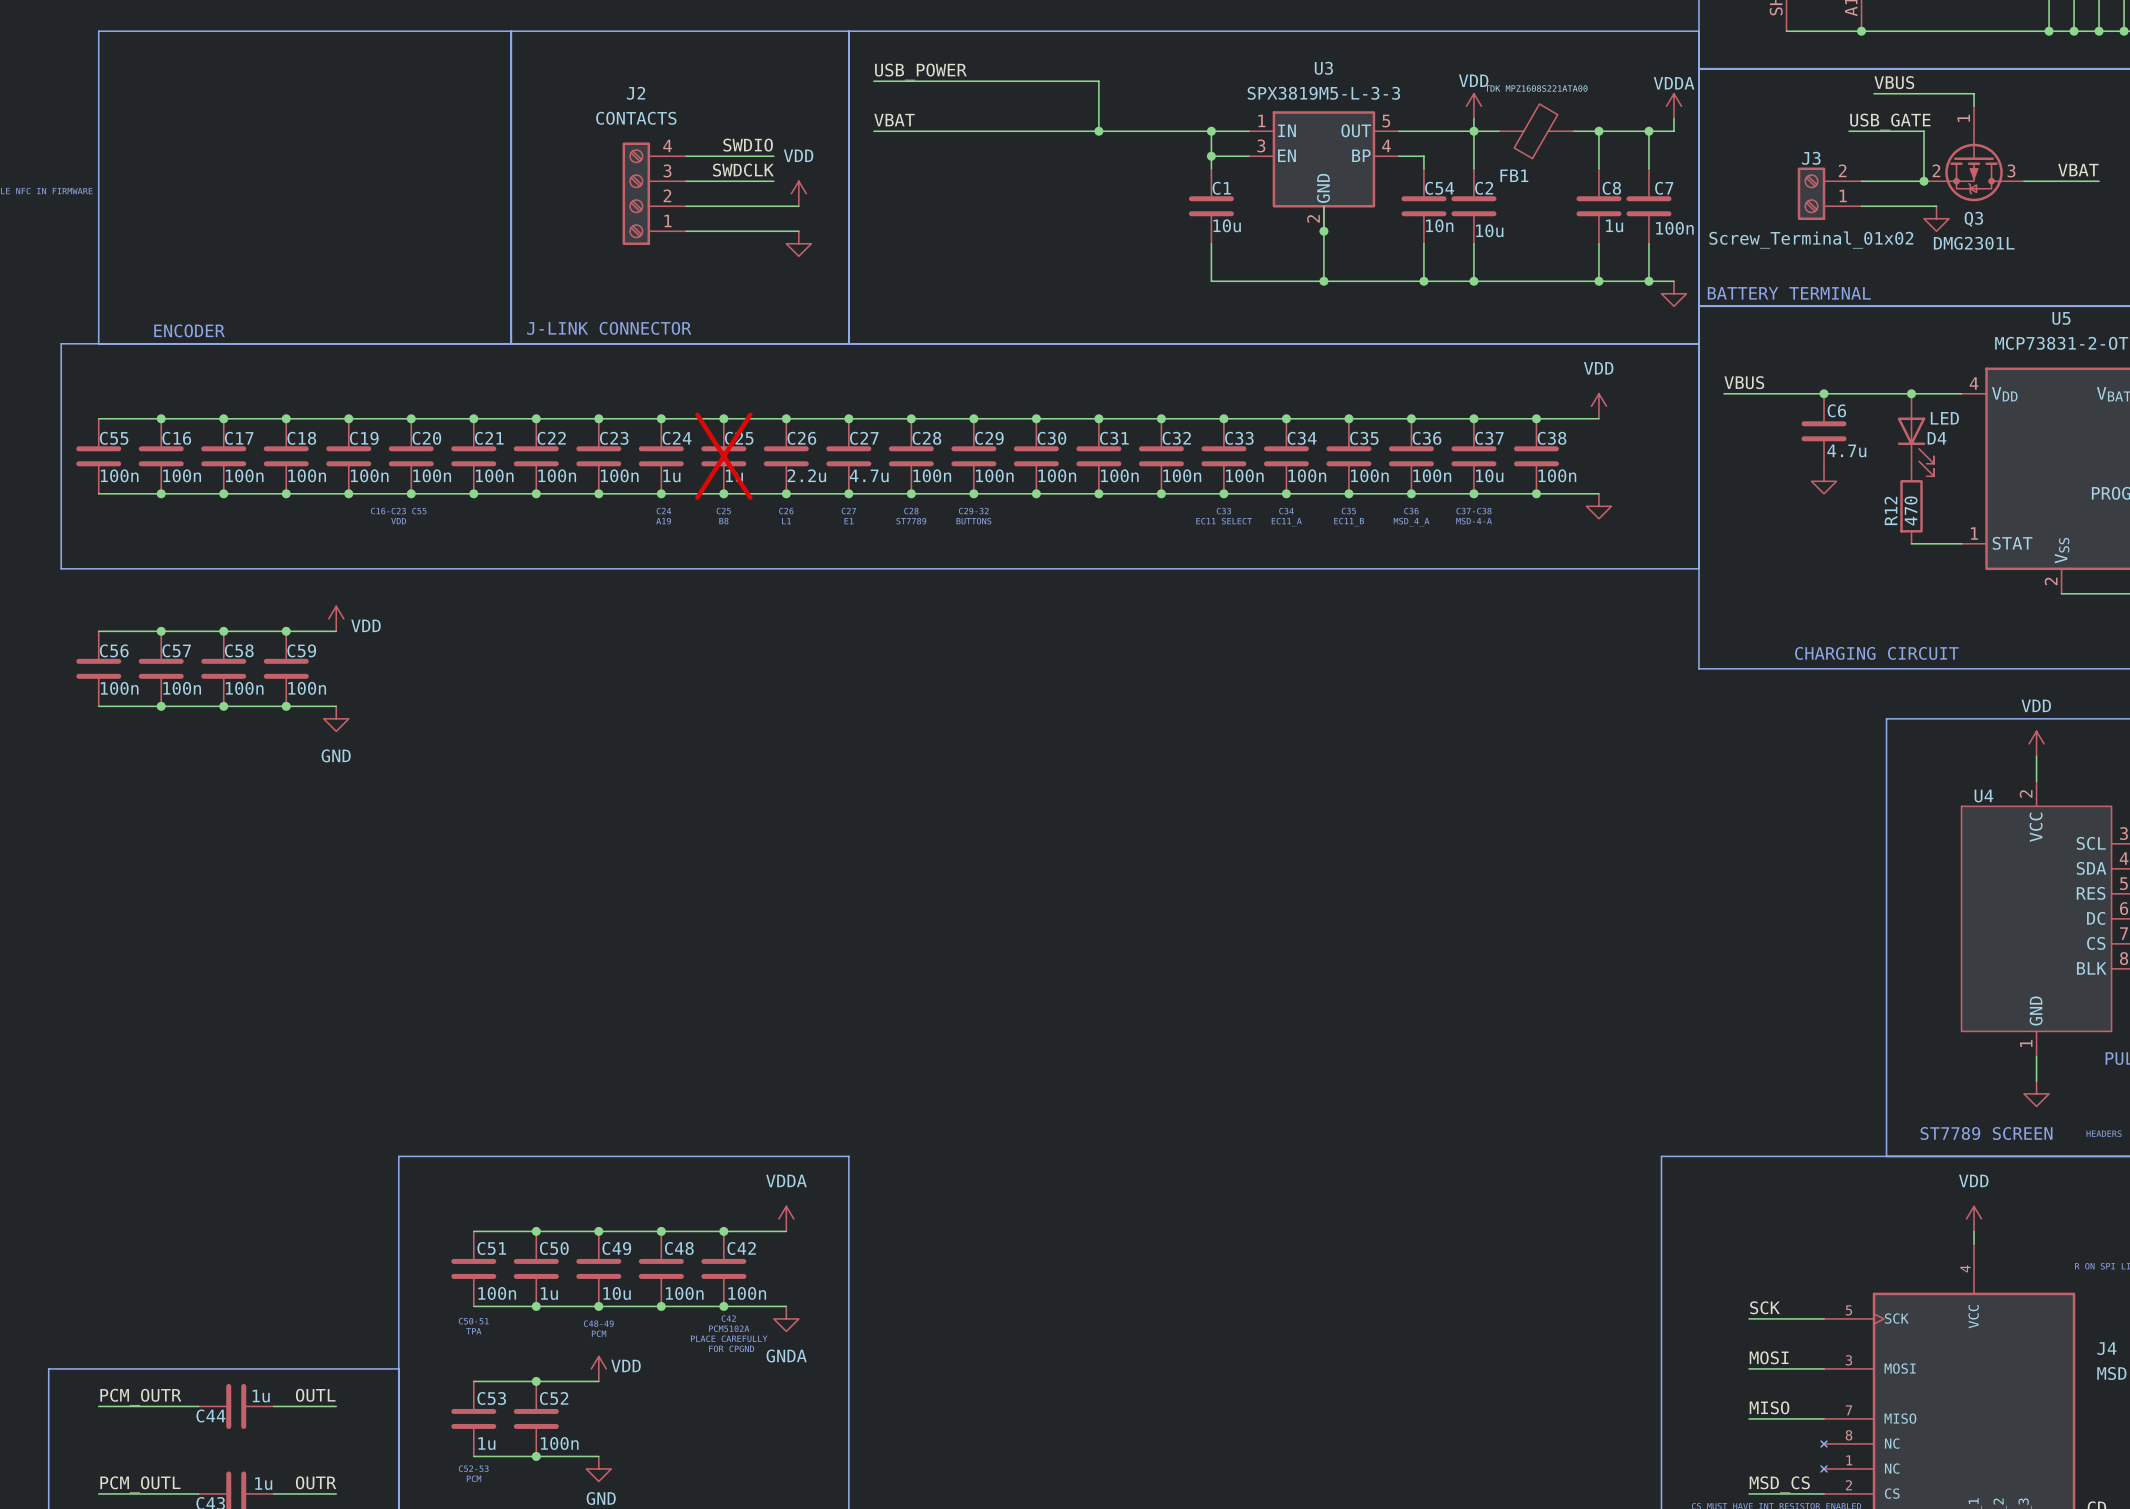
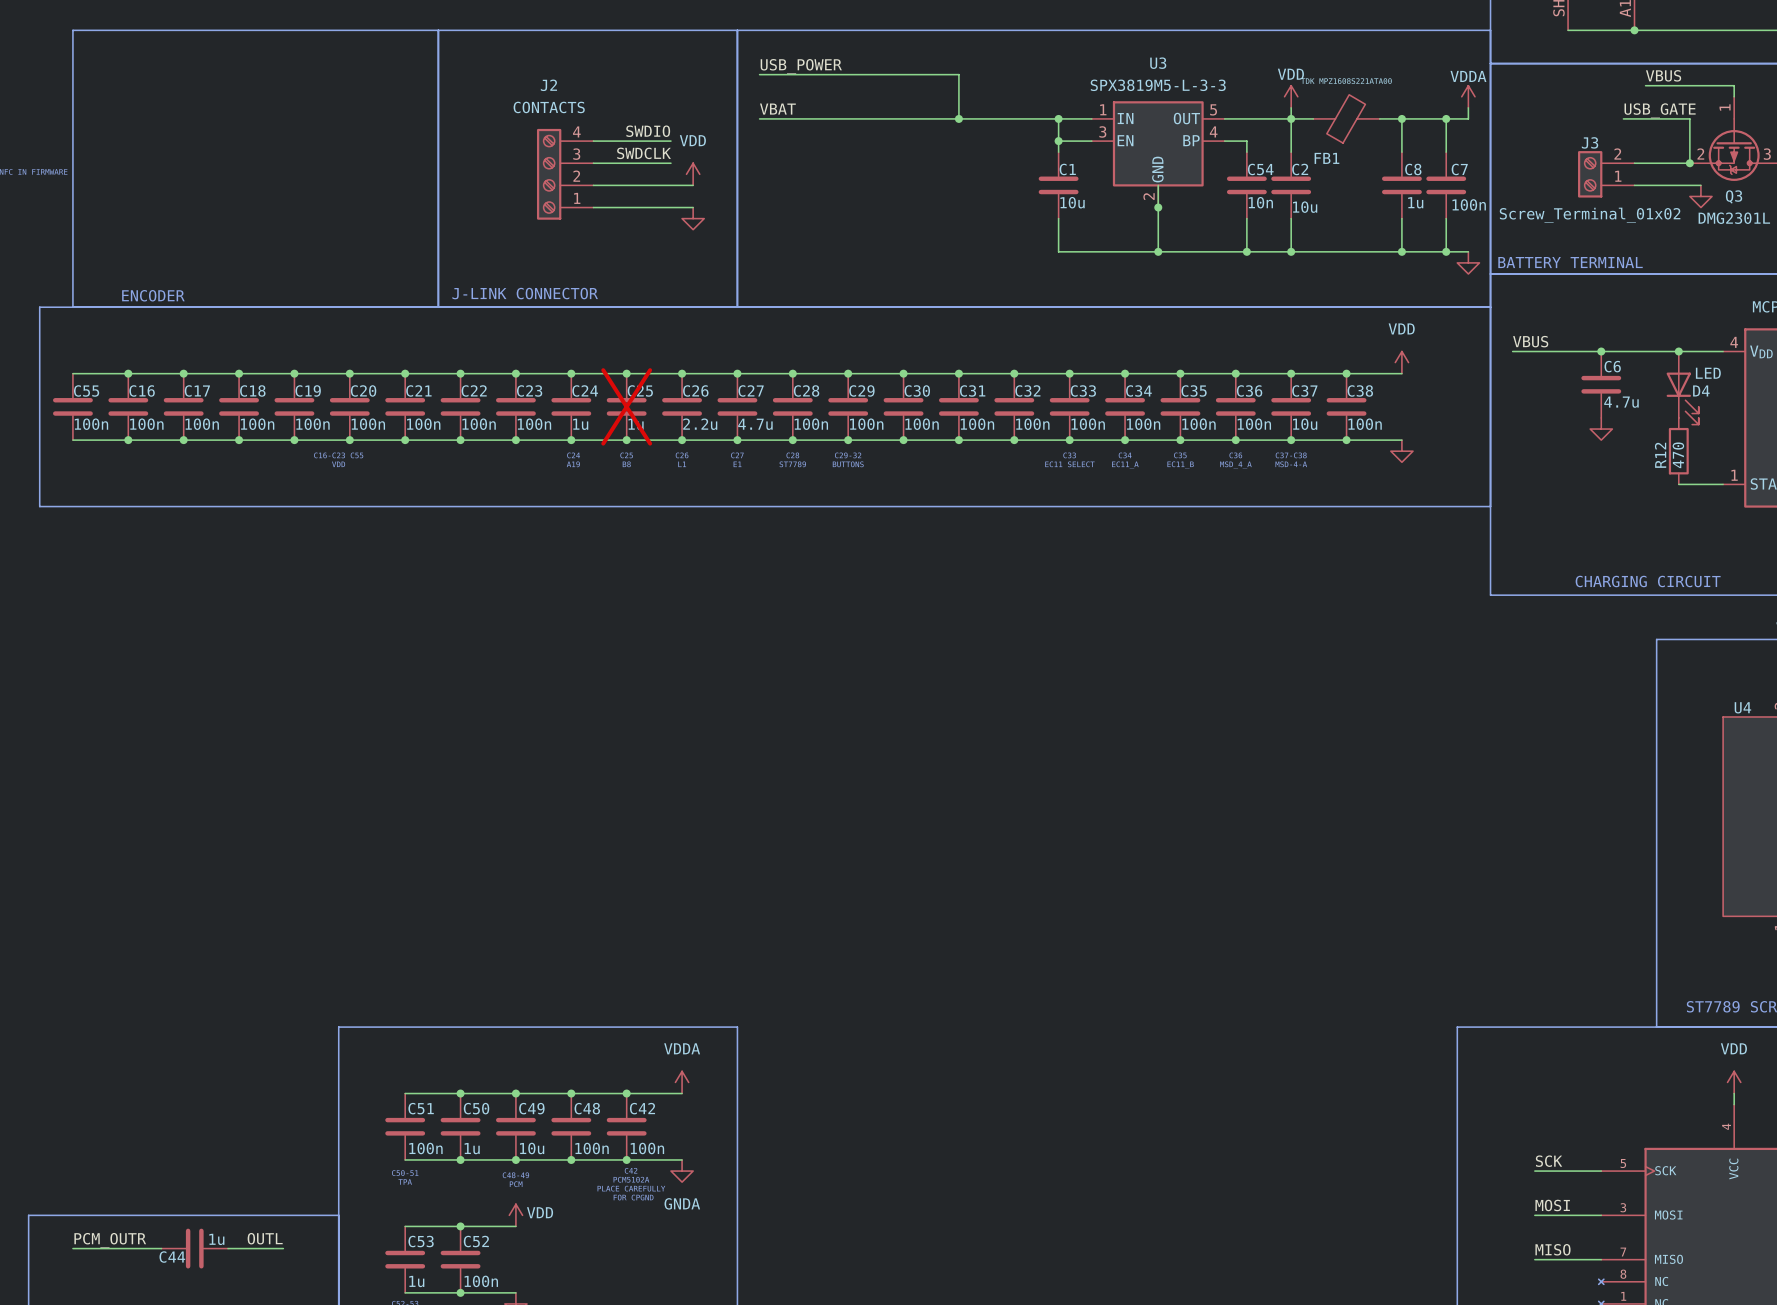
power symbol: VDD (336, 618) -> none
wire: (98, 631) (336, 631) -> none
junction: (161, 631) -> none
junction: (223, 631) -> none
junction: (286, 631) -> none
C56: 100n (98, 668) -> none
C57: 100n (161, 668) -> none
C58: 100n (223, 668) -> none
C59: 100n (286, 668) -> none
wire: (98, 706) (336, 706) -> none
junction: (161, 706) -> none
junction: (223, 706) -> none
junction: (286, 706) -> none
power symbol: GND (336, 718) -> none

